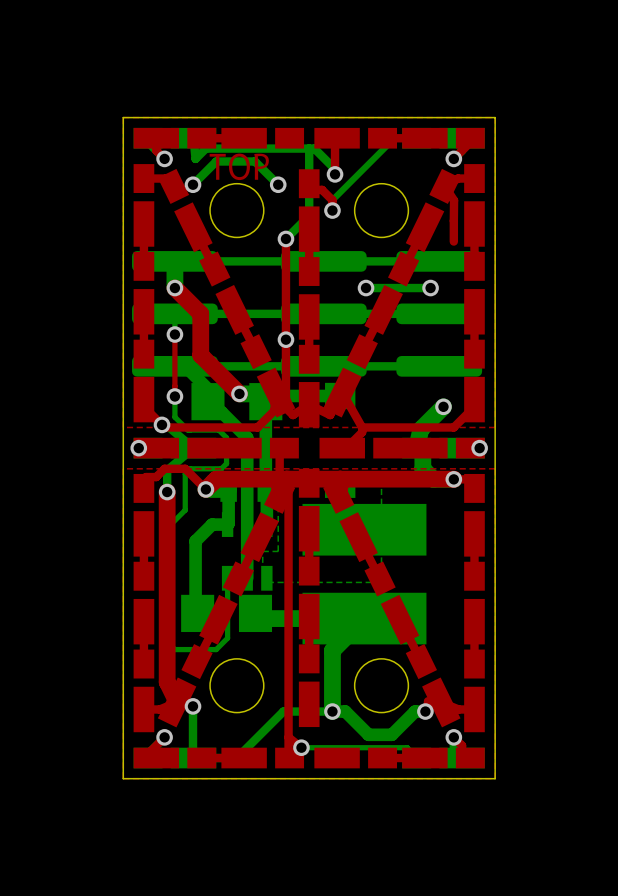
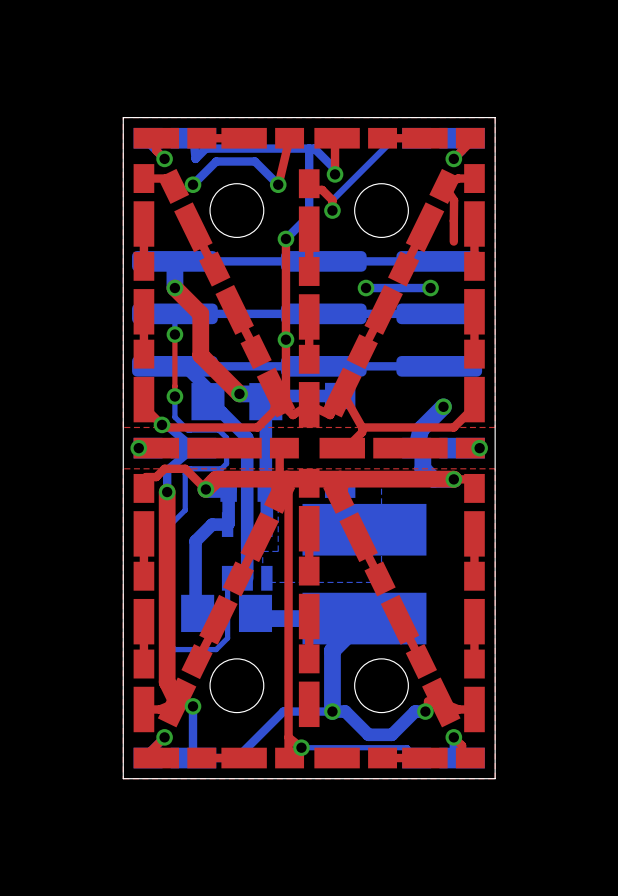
top track: none -> (289, 138) (280, 177)
text: TOP (239, 166) -> none

